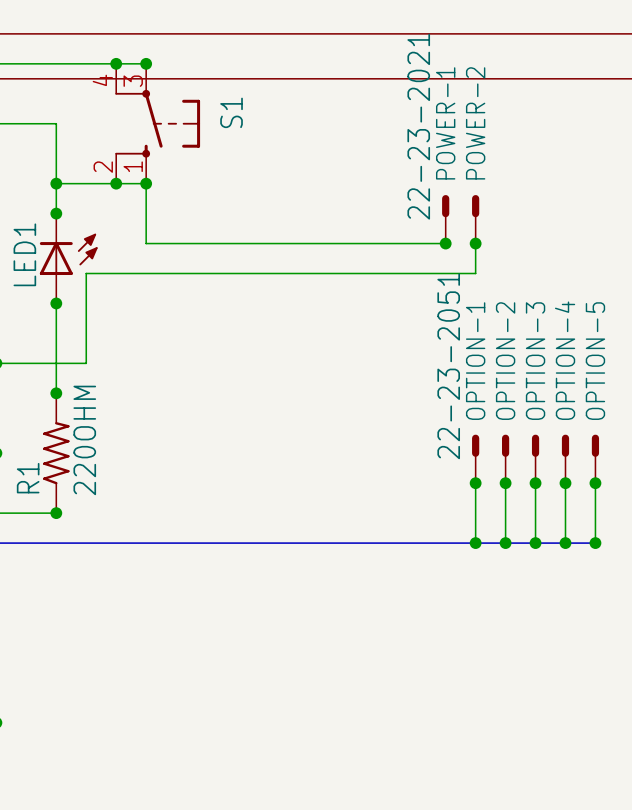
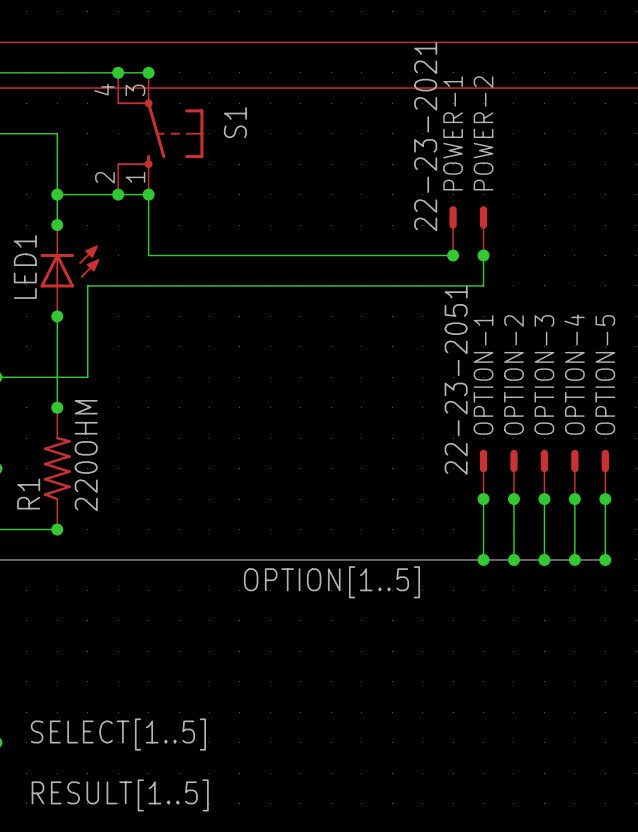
label: none -> OPTION[1..5] (331, 582)
label: none -> SELECT[1..5] (118, 734)
label: none -> RESULT[1..5] (120, 795)

